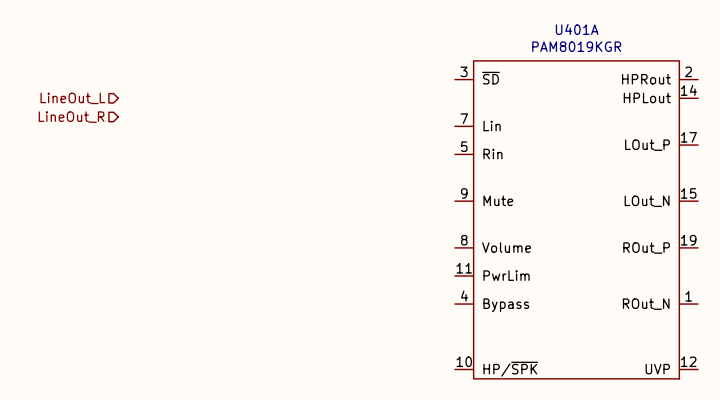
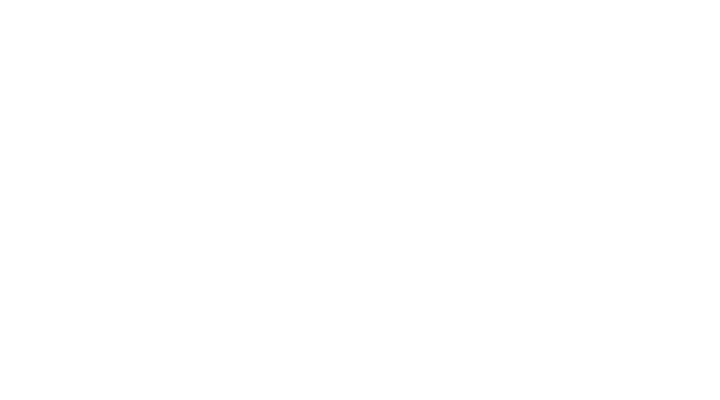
hierarchical label: LineOut_L (72, 98) -> none
hierarchical label: LineOut_R (71, 117) -> none
U401A: PAM8019KGR (576, 219) -> none

